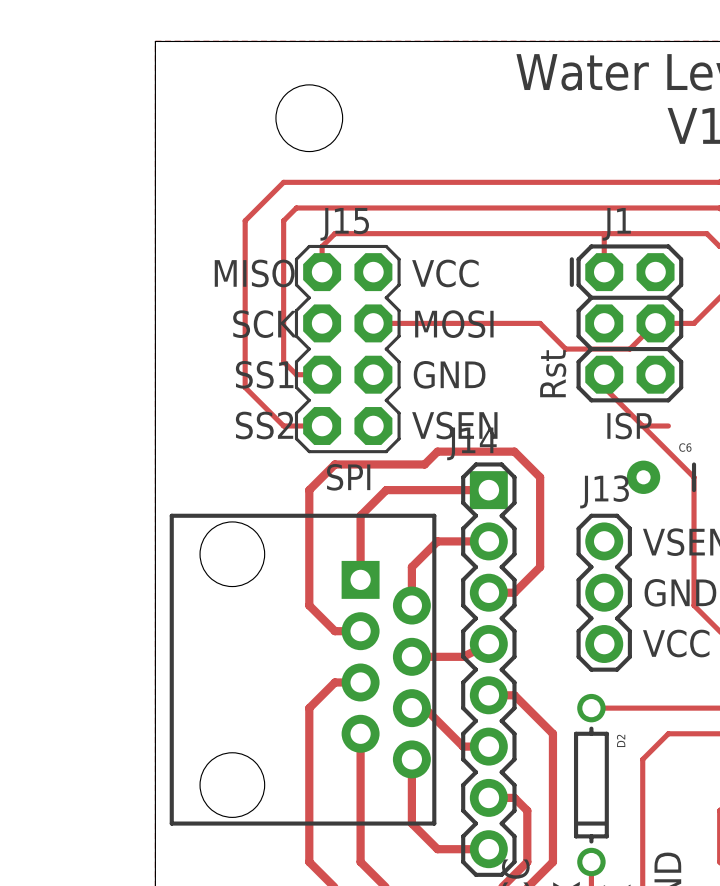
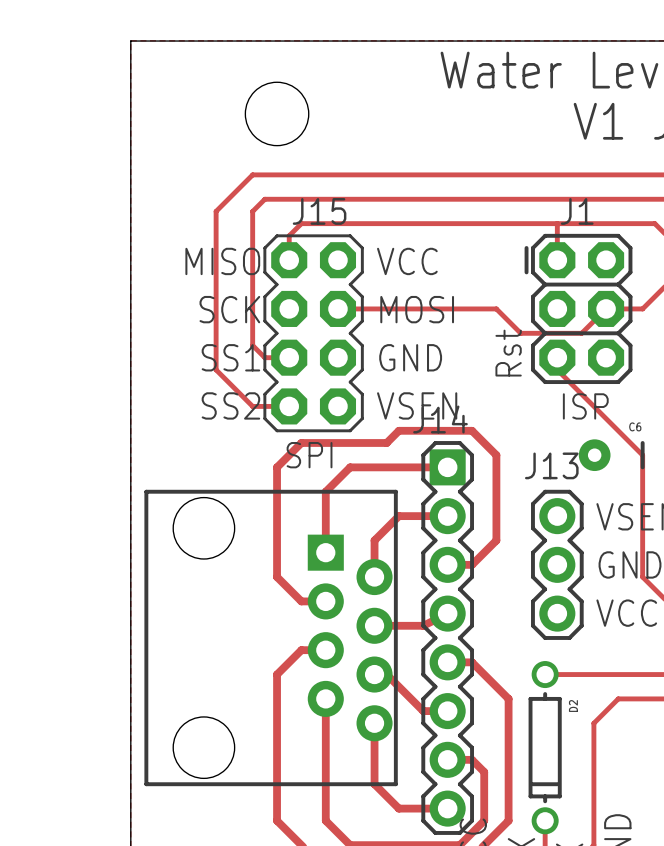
track: (642, 426) (668, 426) -> none

